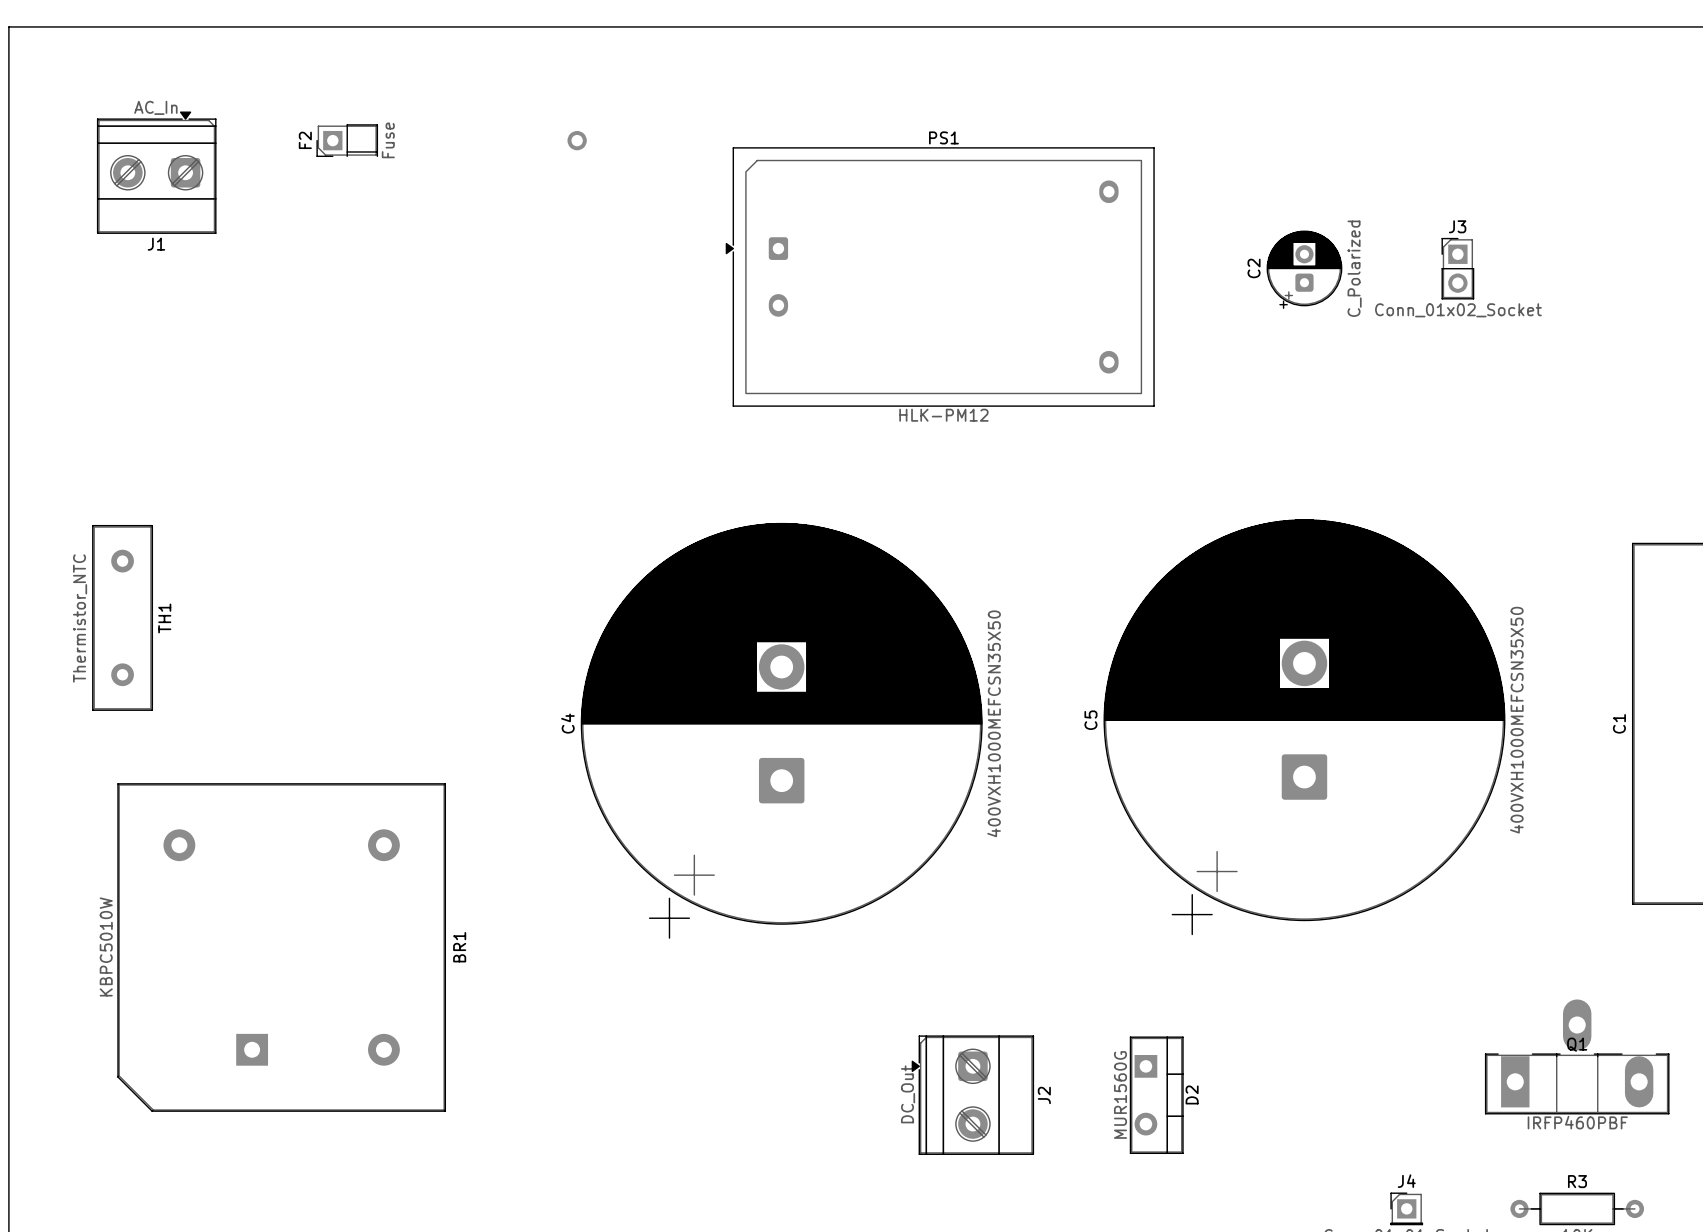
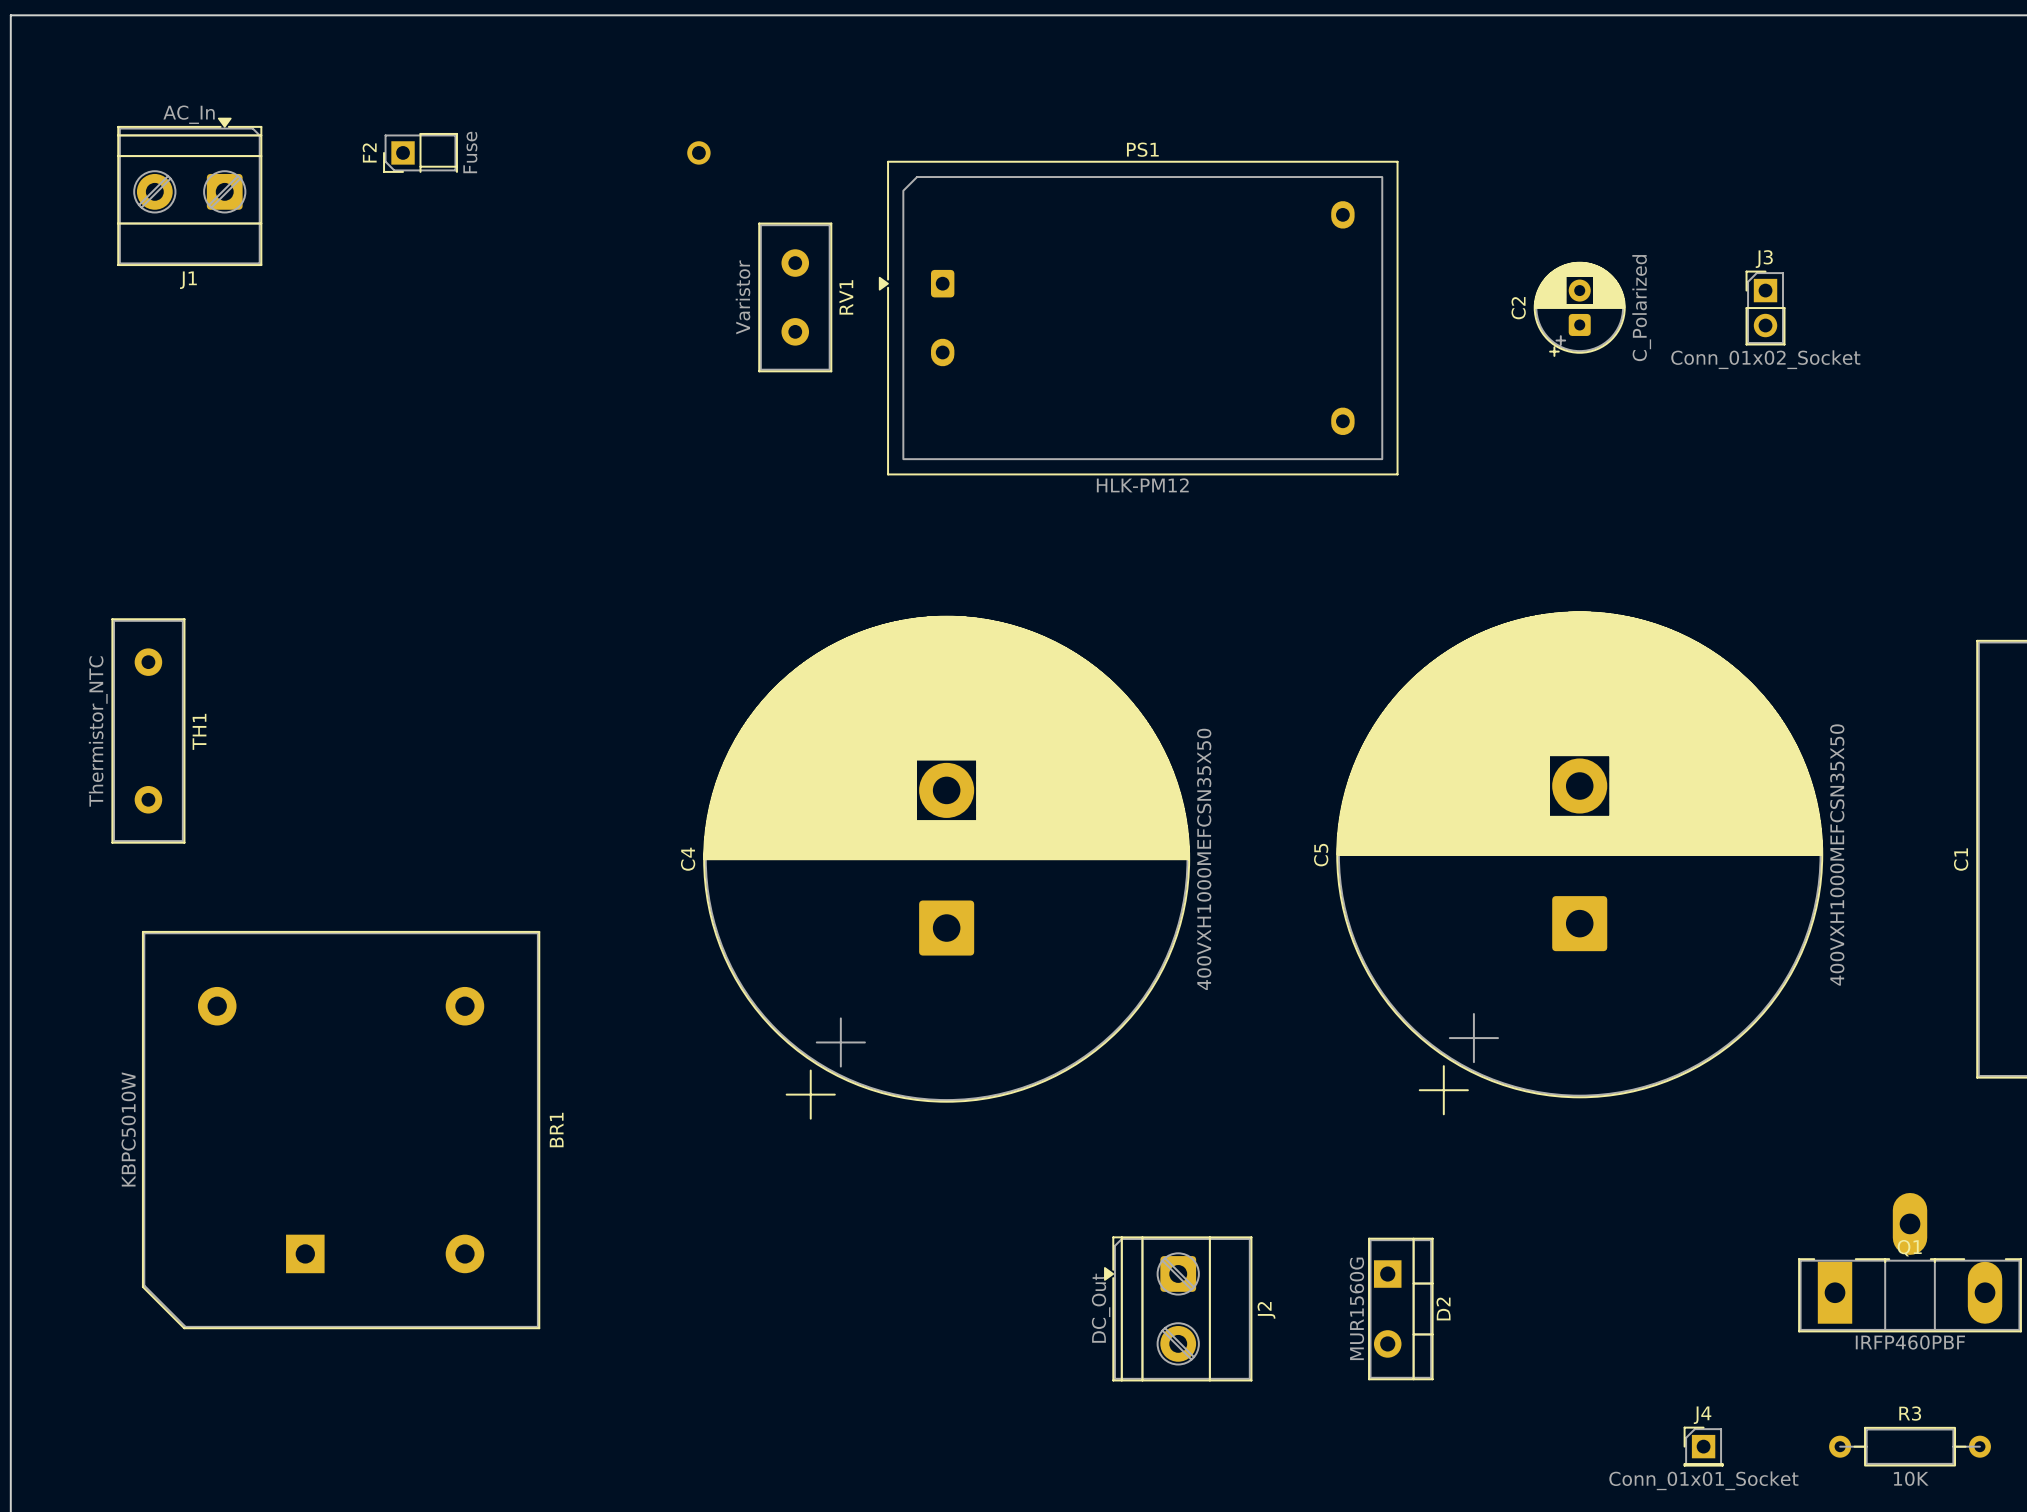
RV1: none -> Varistor (795, 297)

